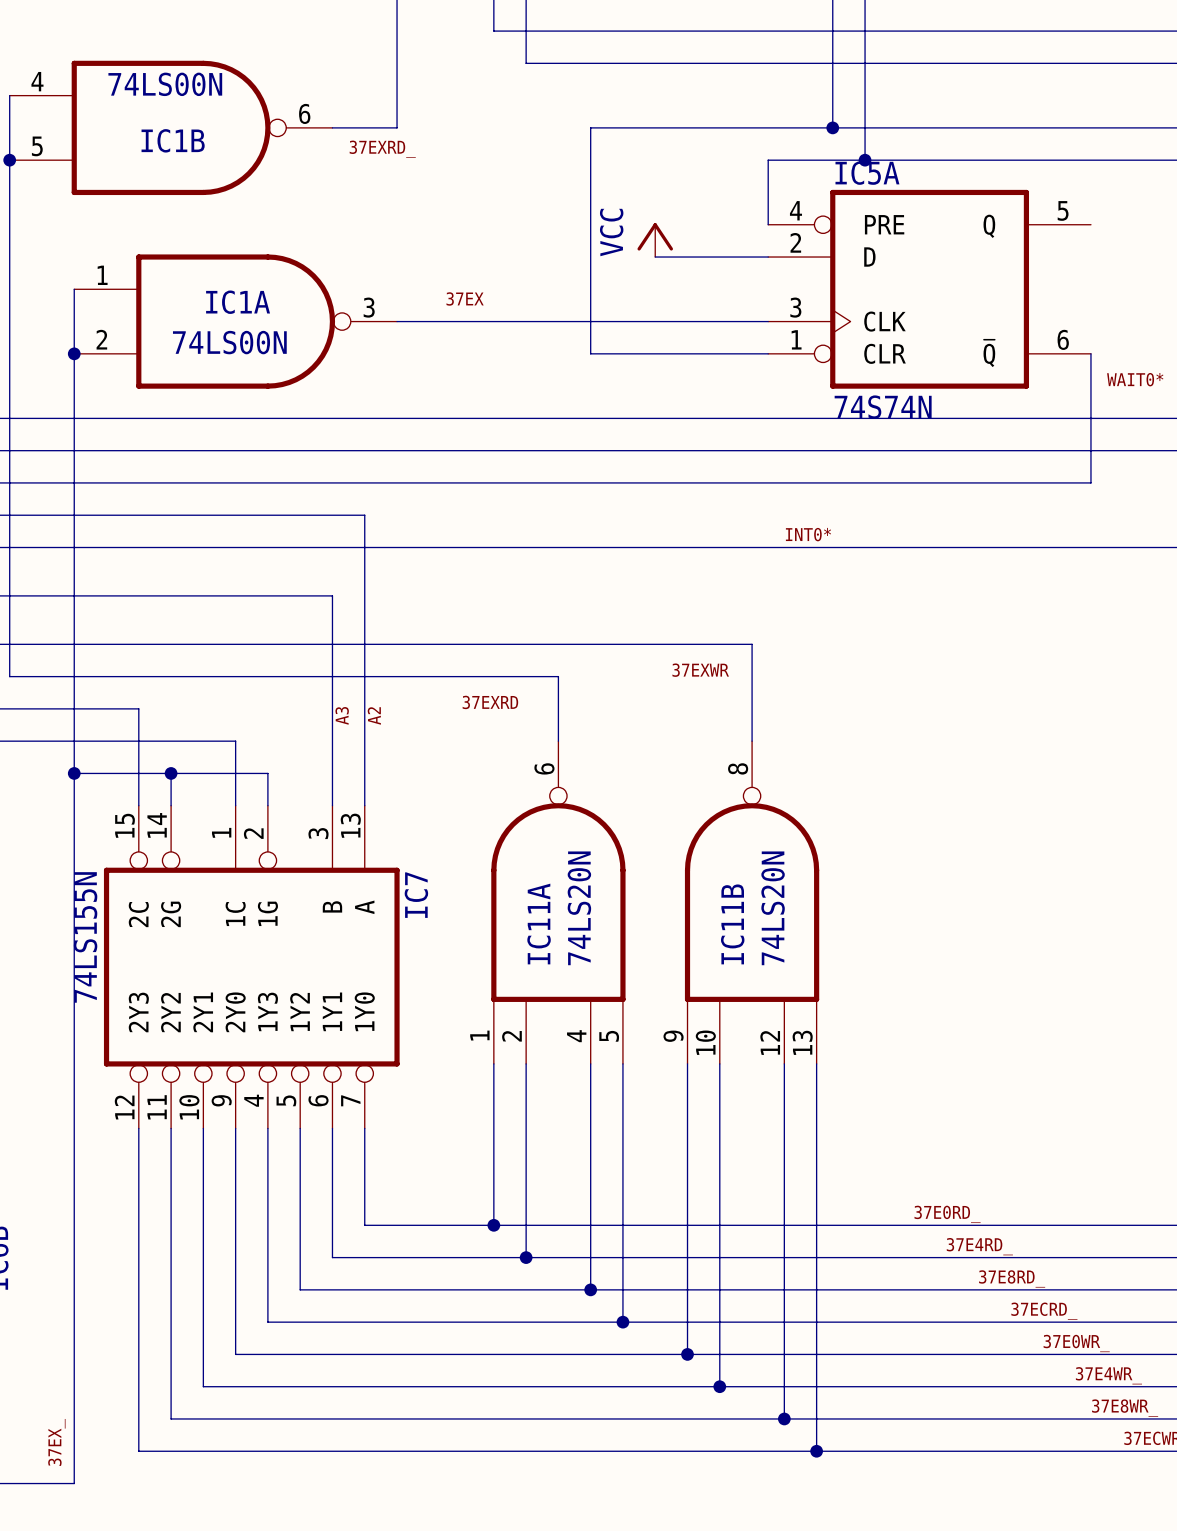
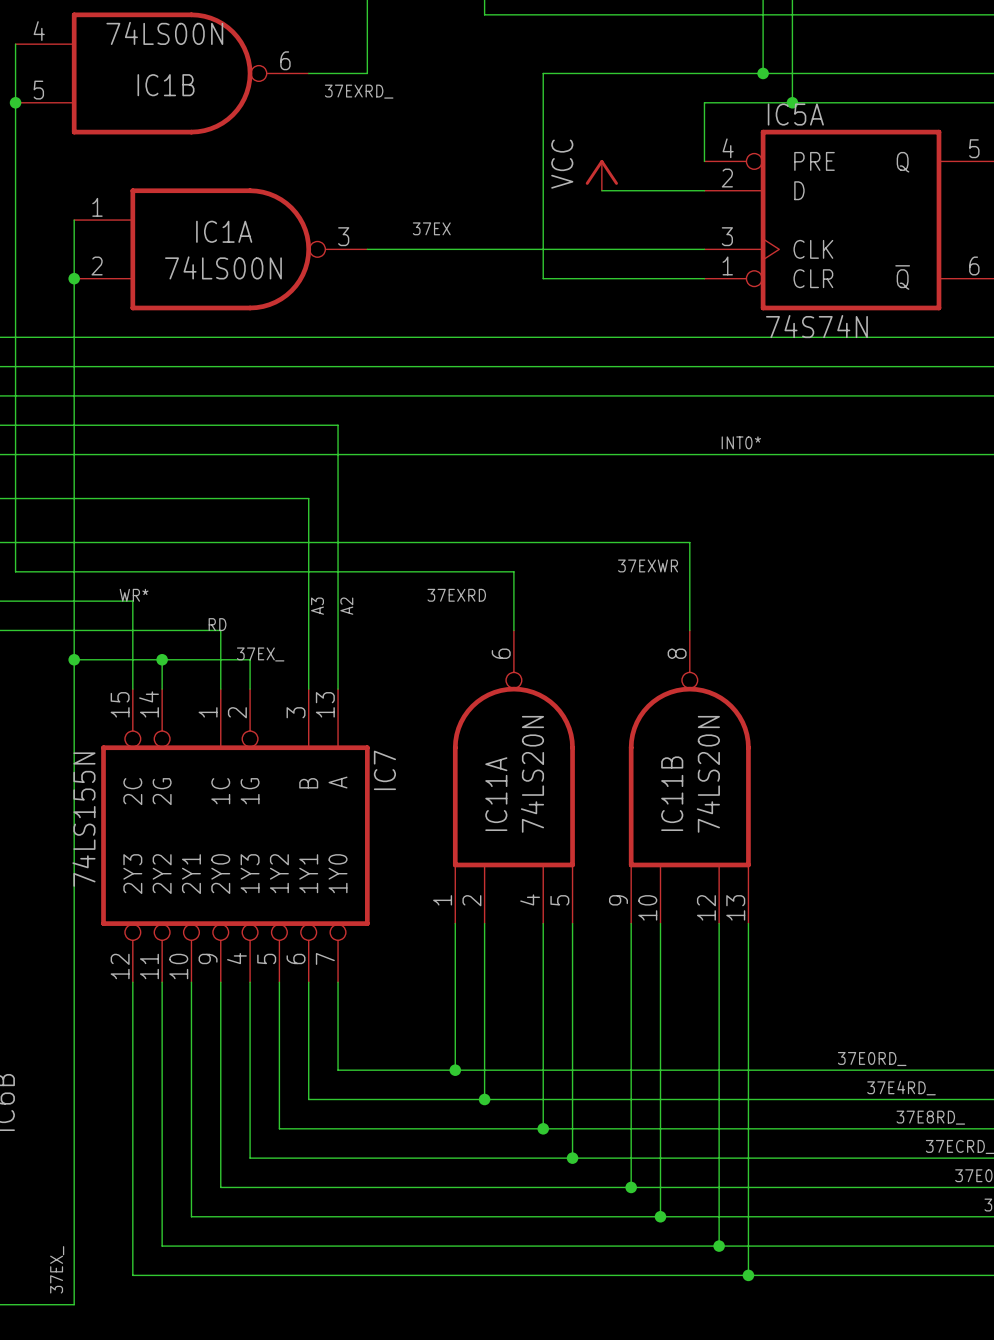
label: none -> WR* (134, 595)
label: none -> RD (217, 624)
label: none -> 37EX_ (260, 654)

